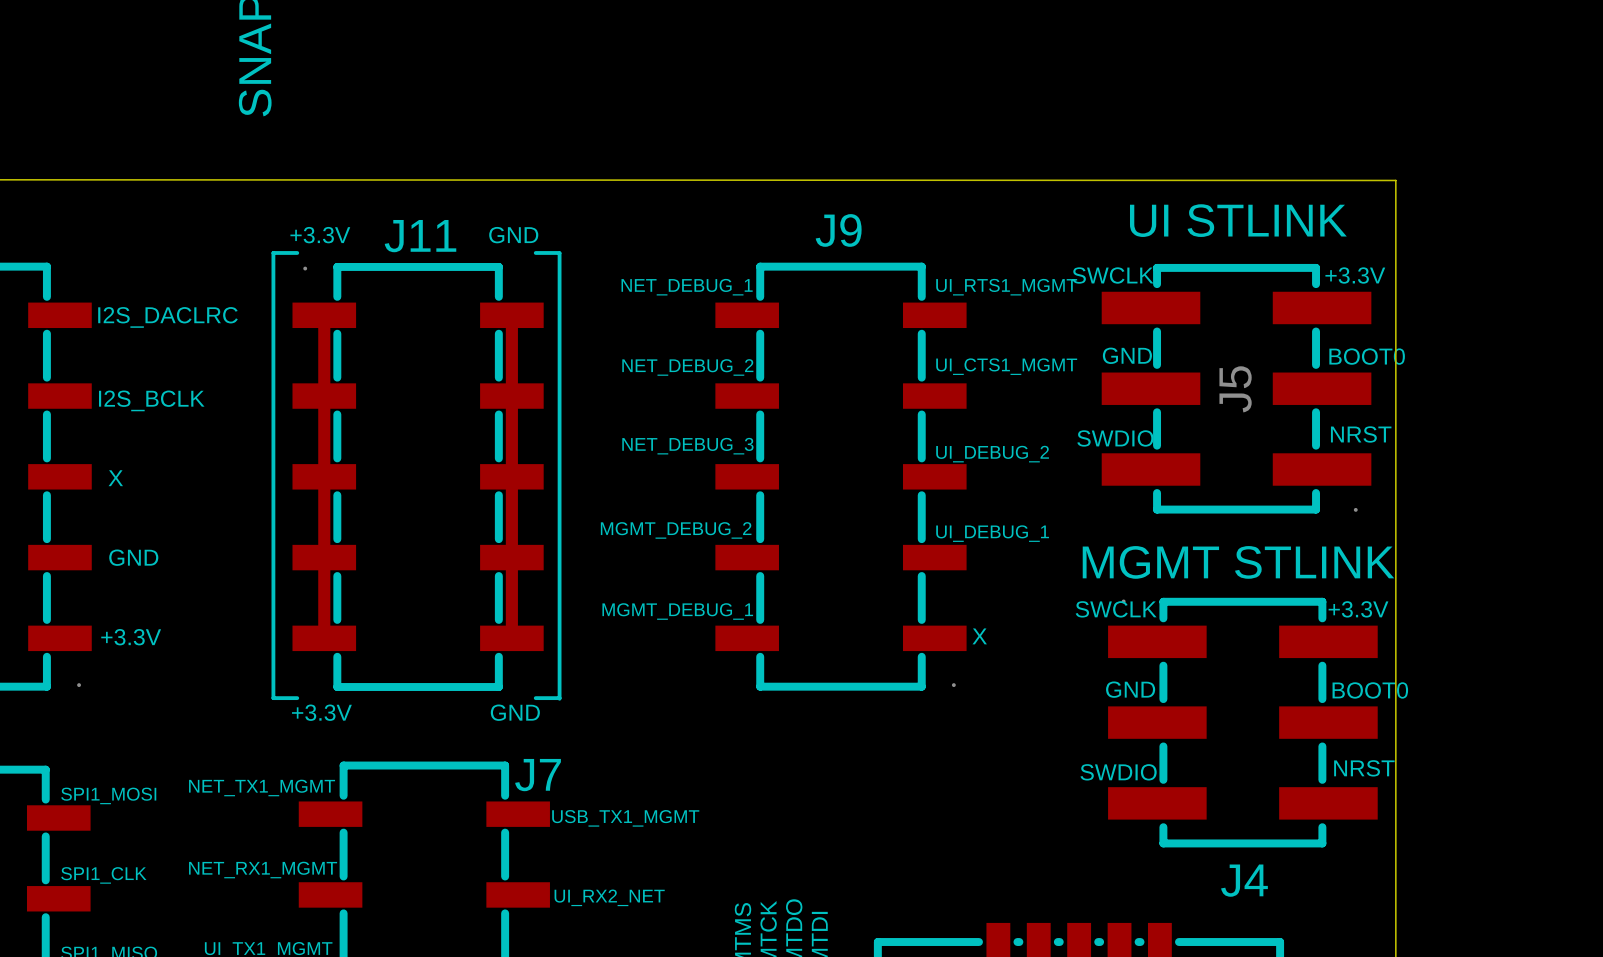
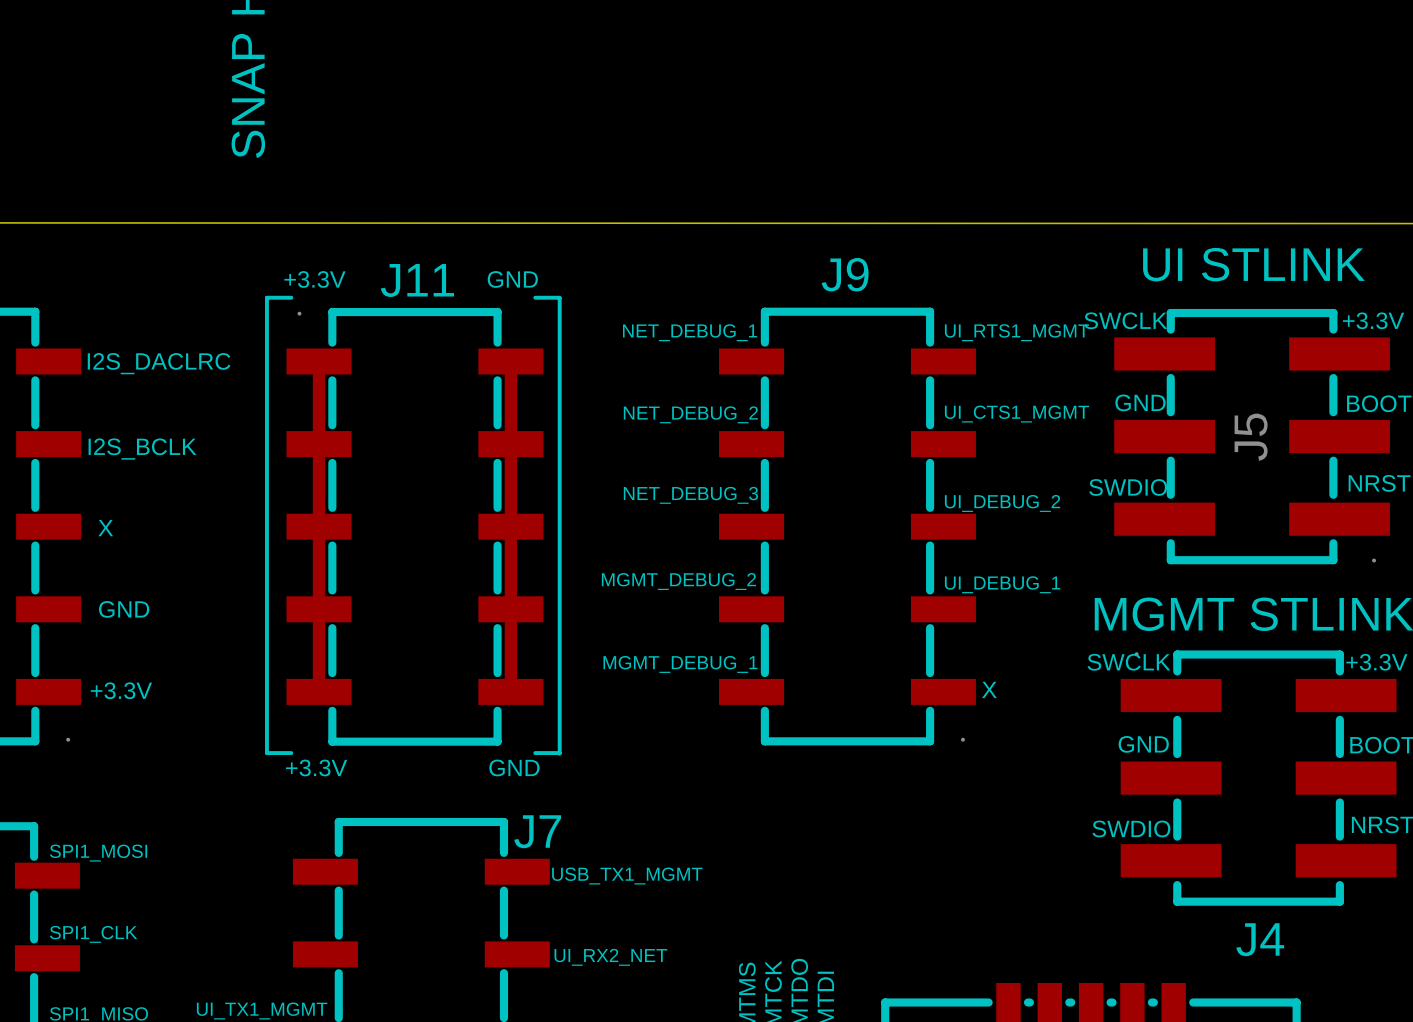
text: NET_TX1_MGMT (262, 787) -> none
text: NET_RX1_MGMT (263, 870) -> none

